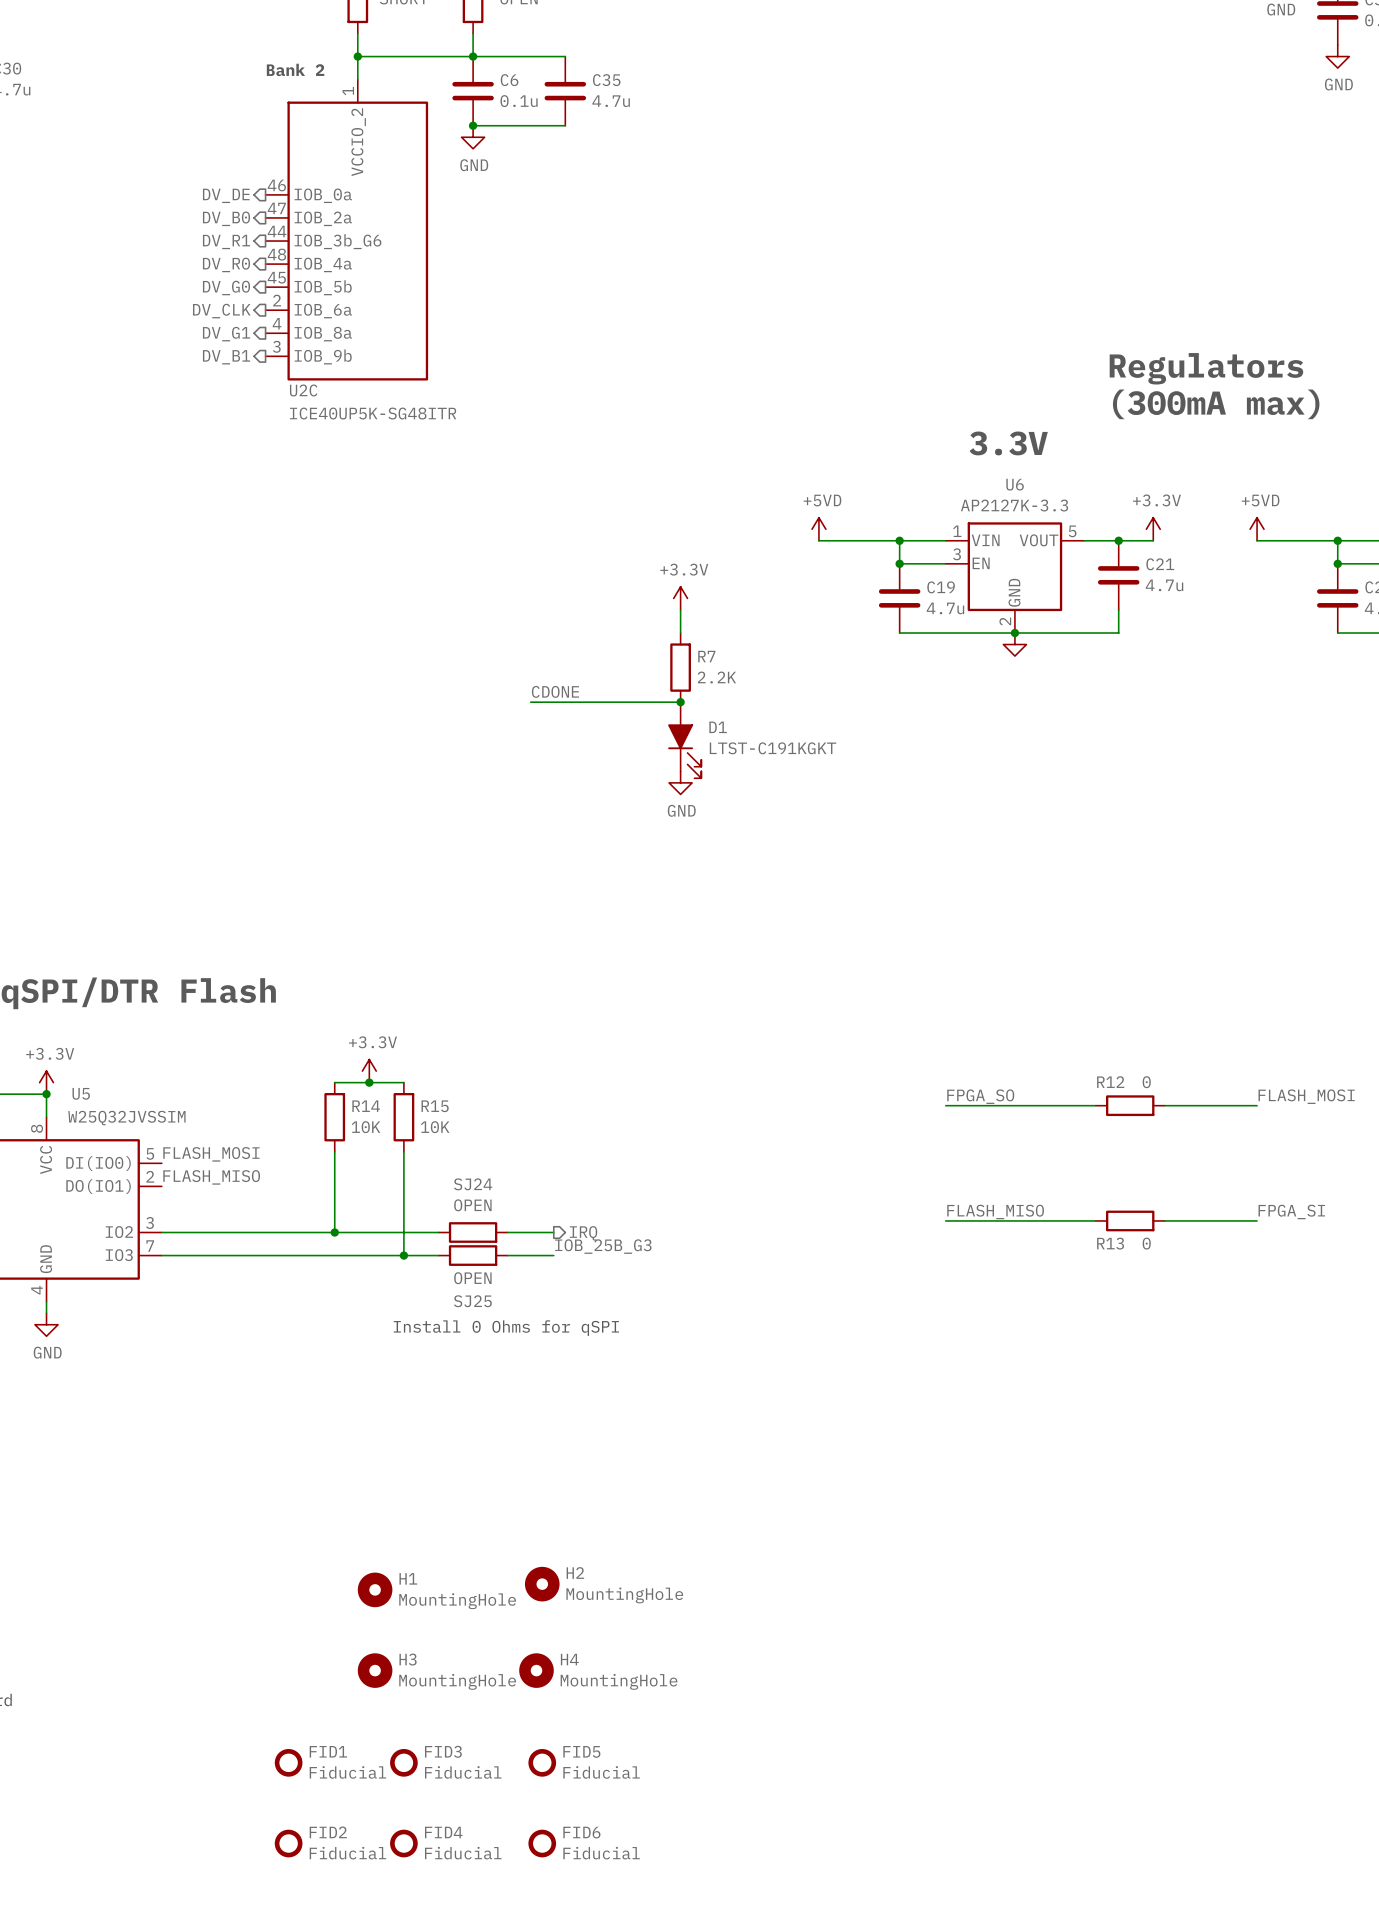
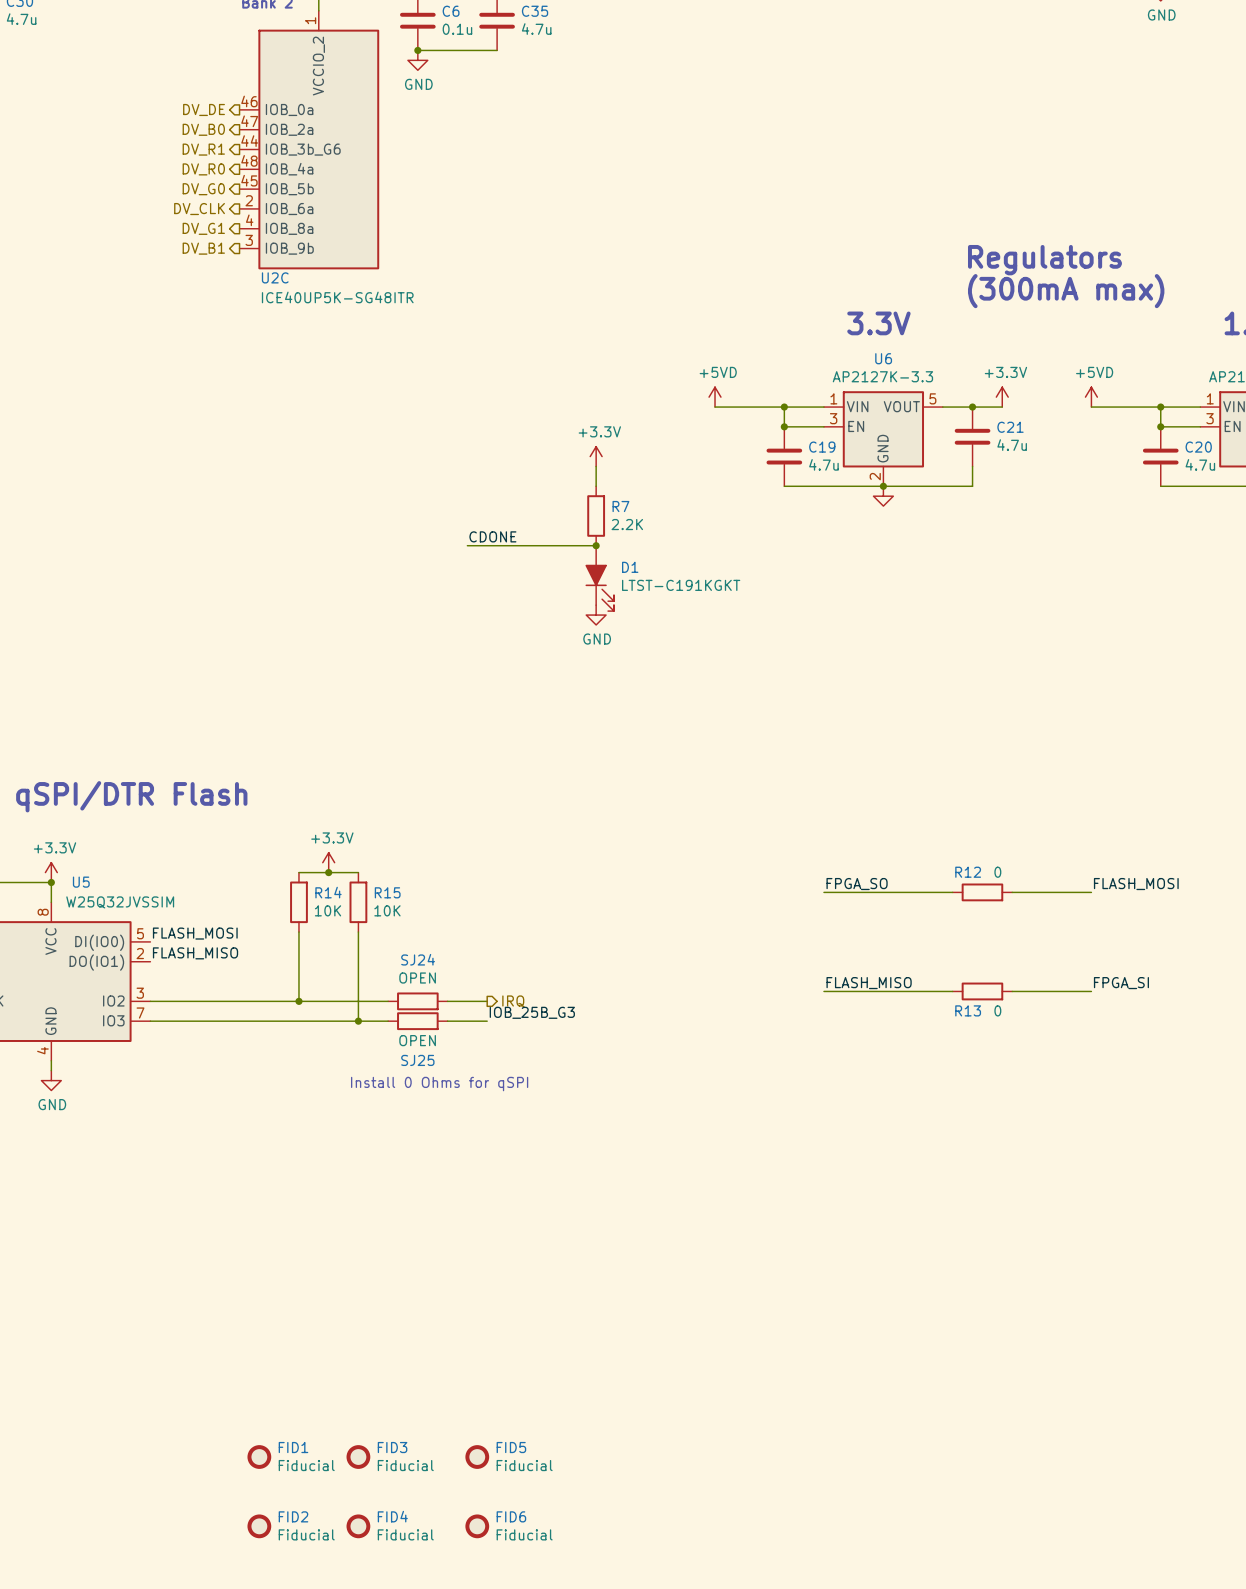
H2: MountingHole (542, 1584) -> none
H1: MountingHole (375, 1589) -> none
H3: MountingHole (375, 1670) -> none
H4: MountingHole (536, 1670) -> none

